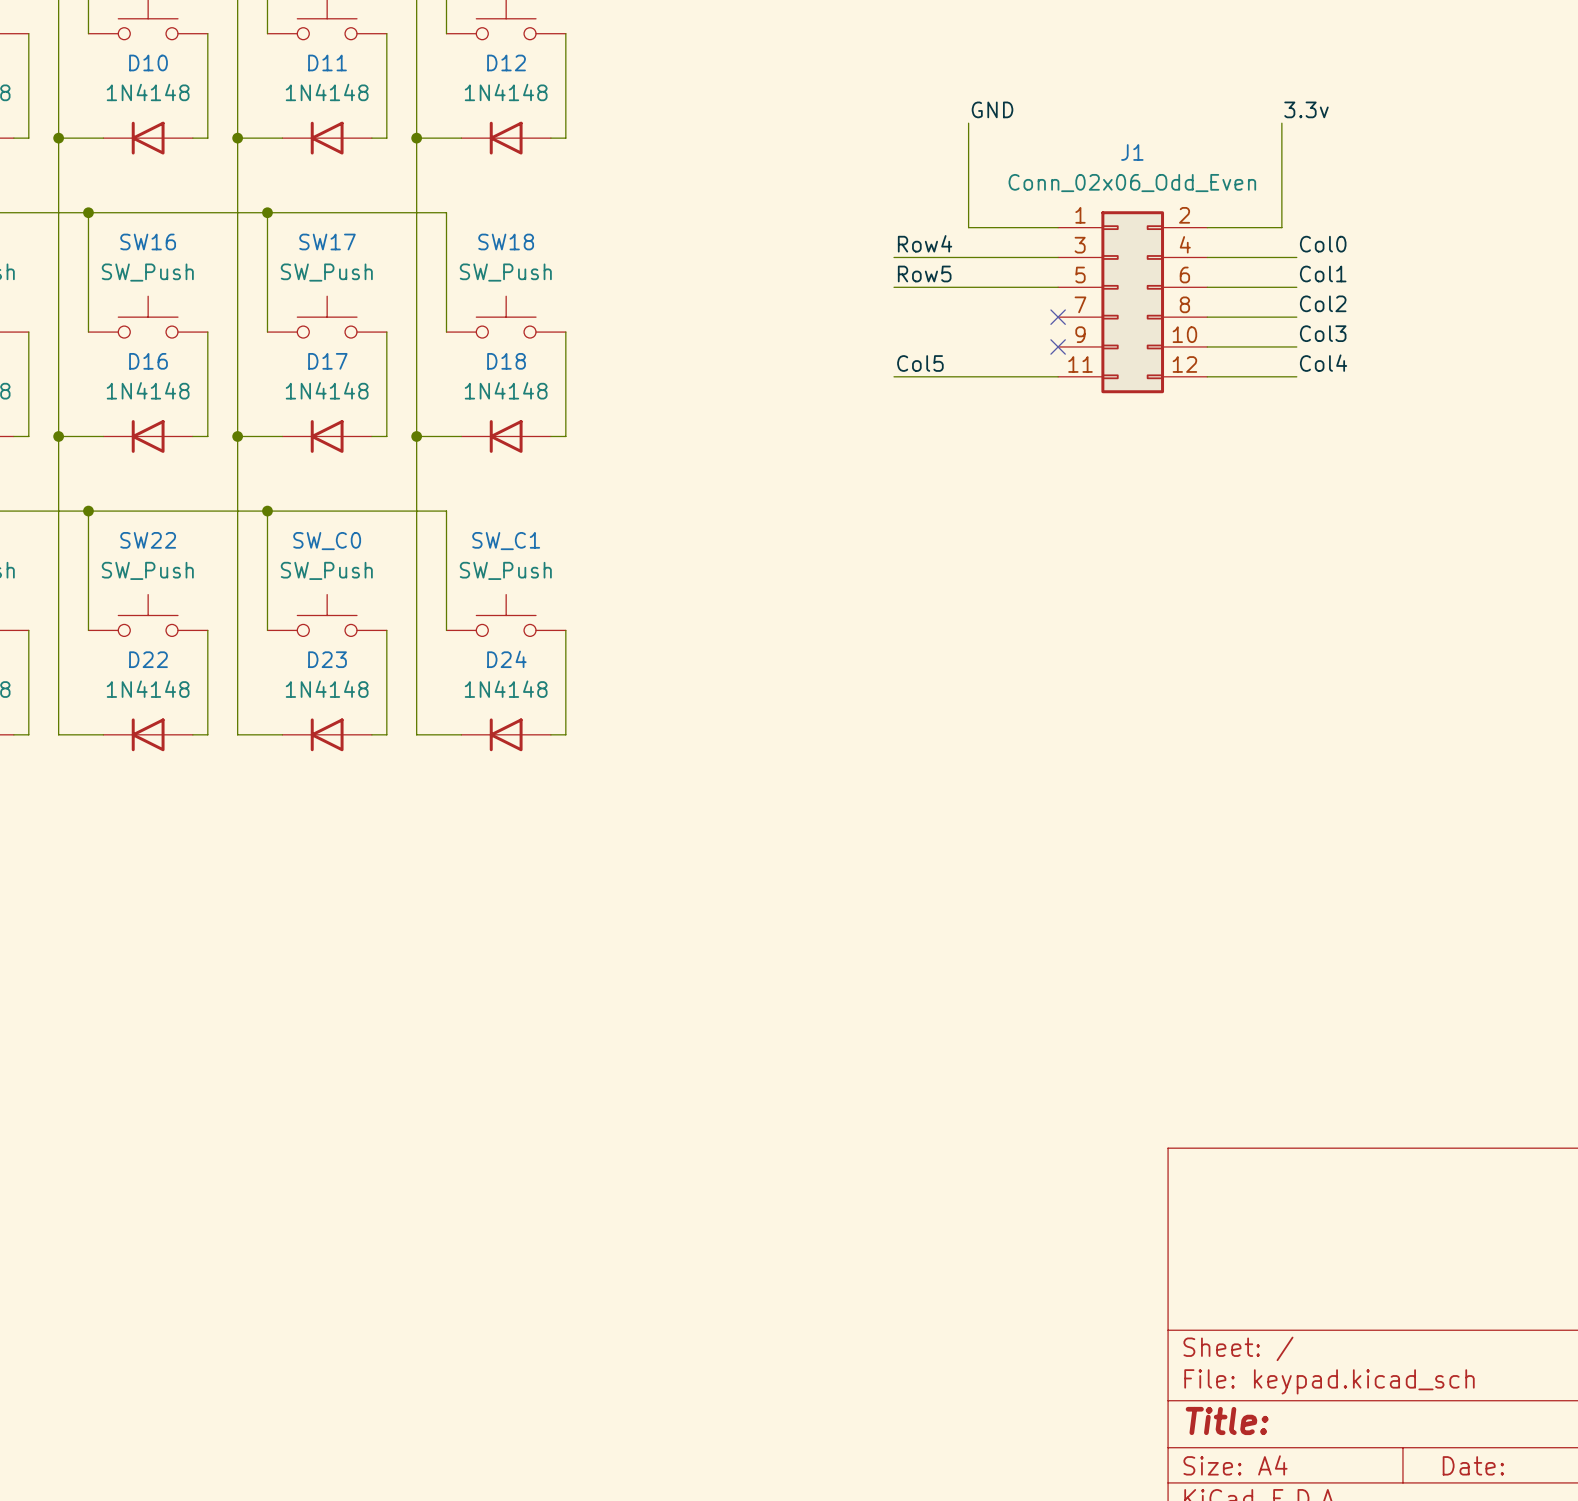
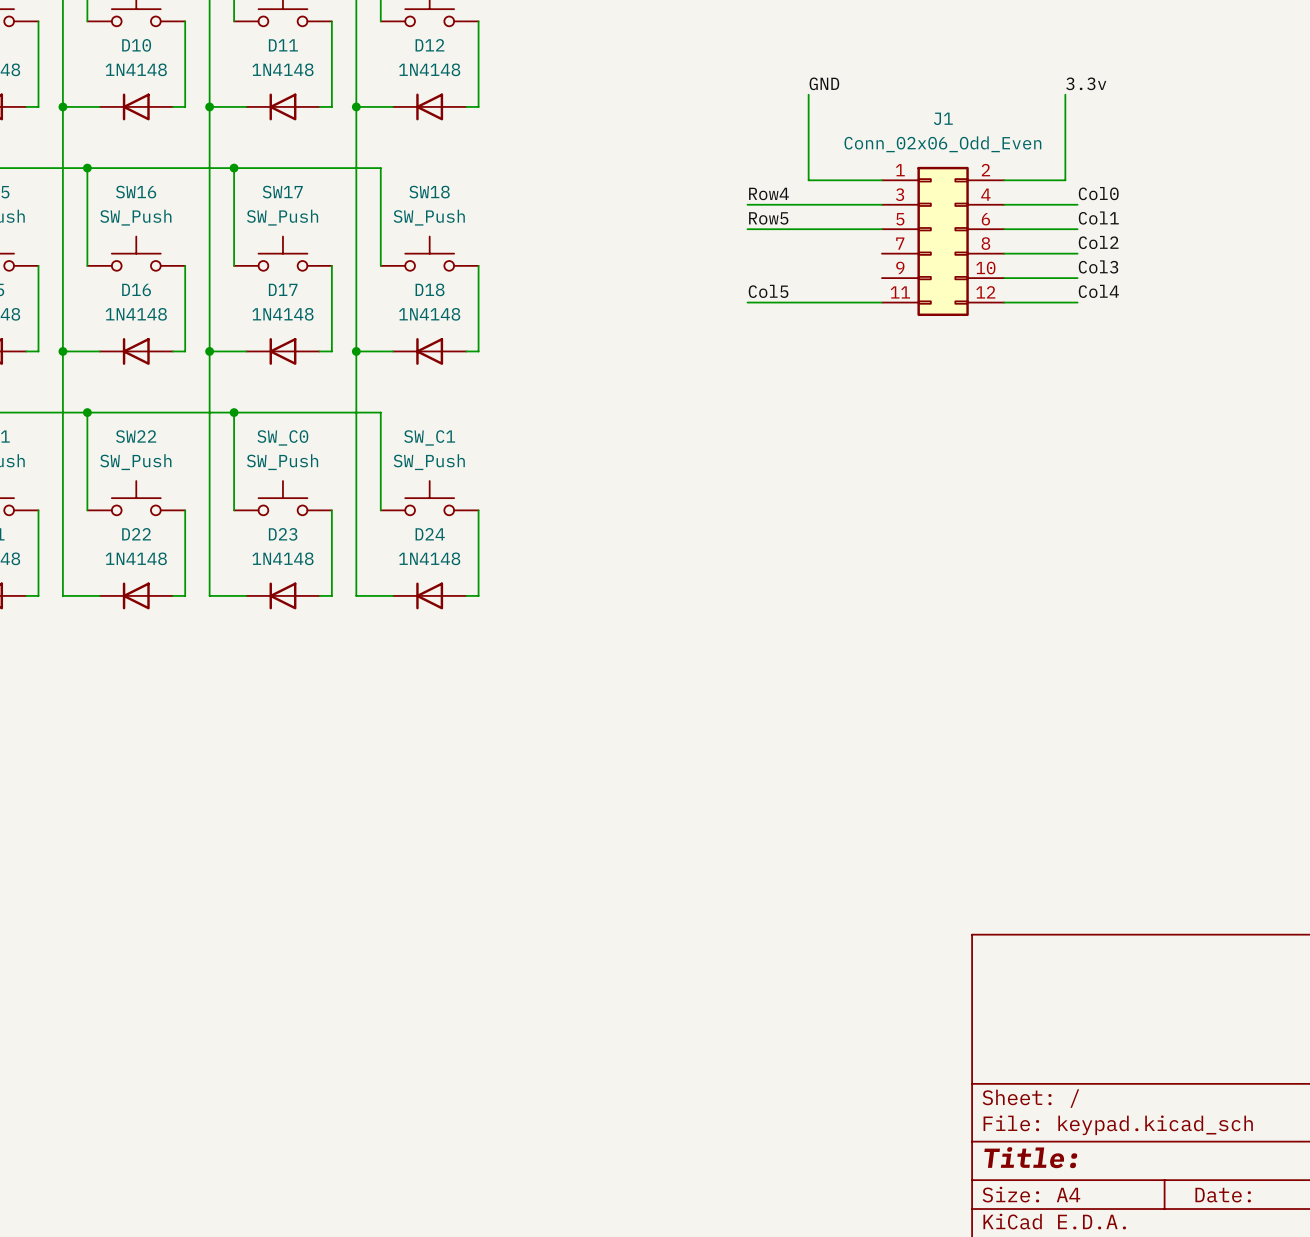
no-connect mark: (1058, 317) -> none
no-connect mark: (1058, 346) -> none

